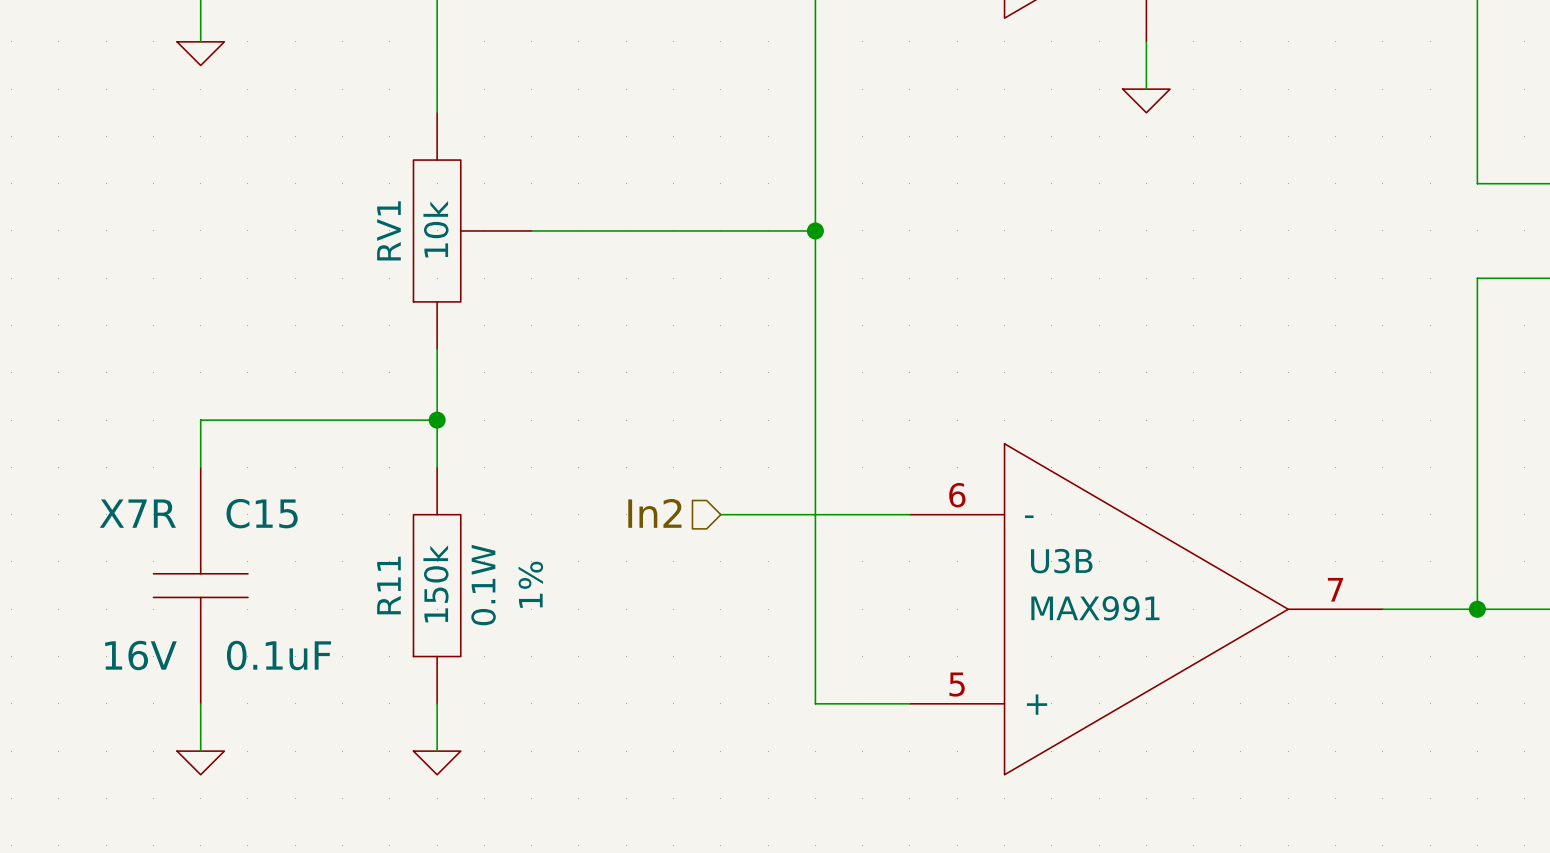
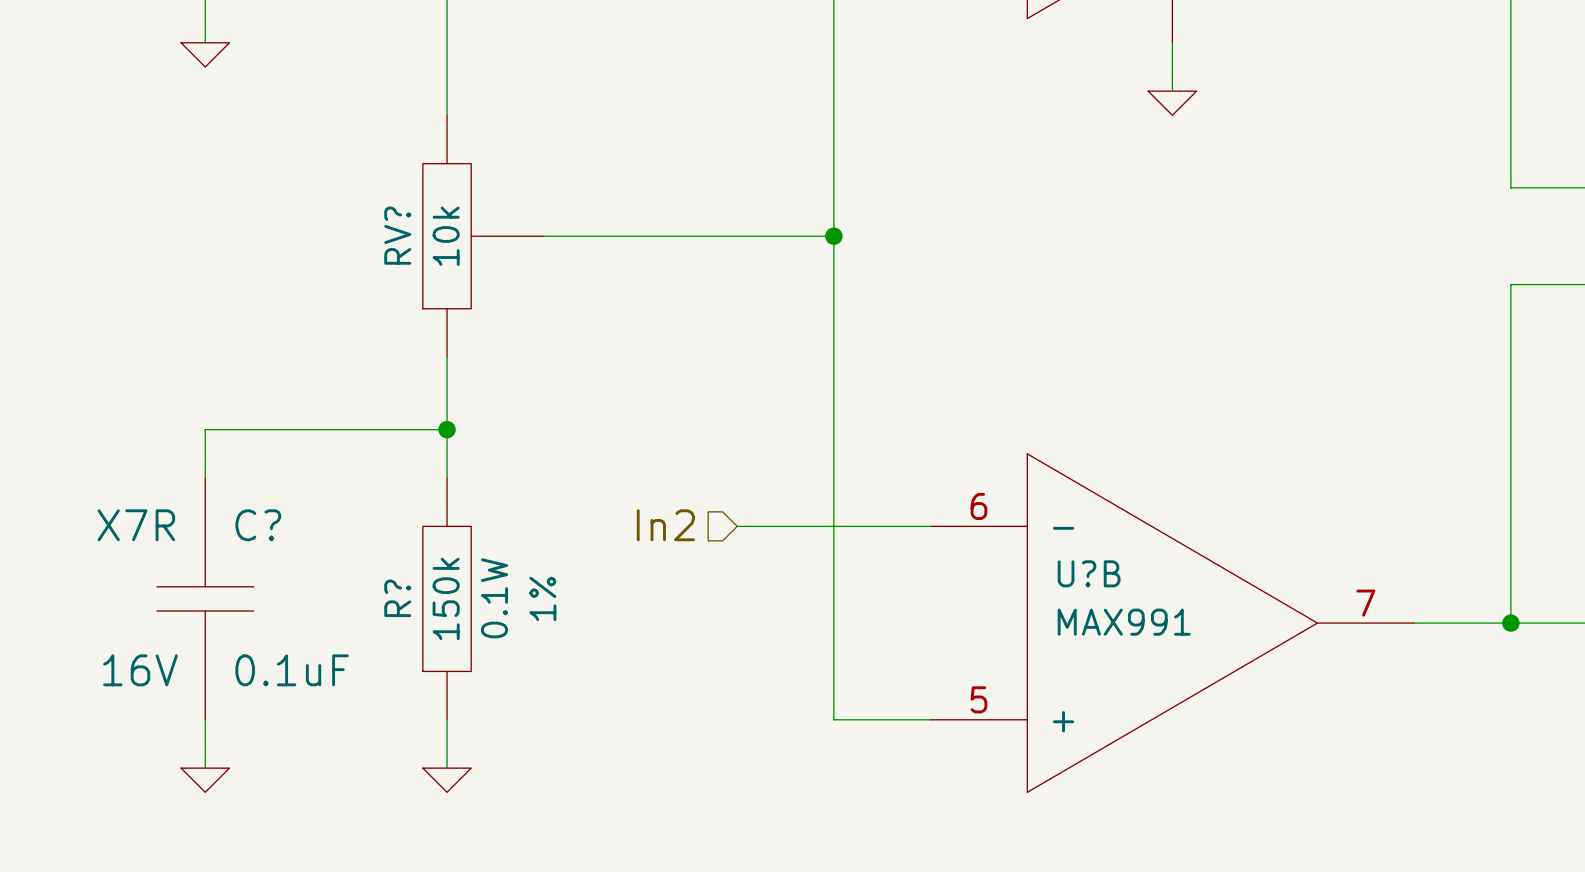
RV1 name: RV1 (388, 230) -> RV? (397, 235)
C15 name: C15 (262, 513) -> C? (258, 525)
U3B name: U3B (1061, 561) -> U?B (1089, 573)
R11 name: R11 (388, 585) -> R? (397, 598)

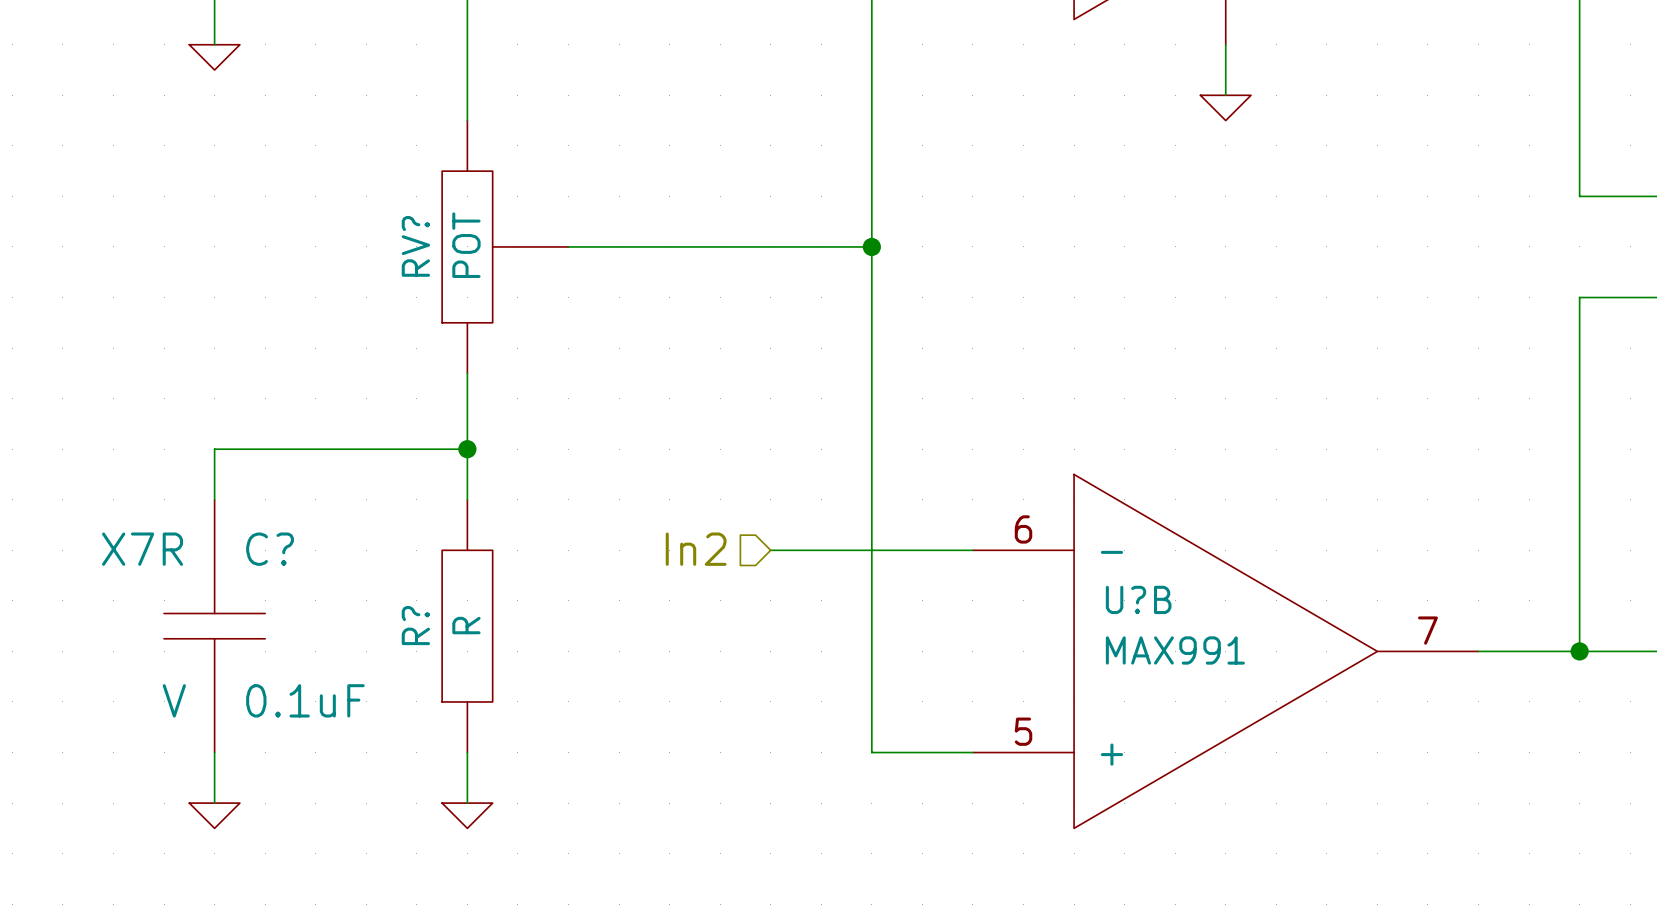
RV? value: 10k (446, 236) -> POT (466, 245)
R? value: 150k (446, 598) -> R (466, 625)
R? text: 0.1W (494, 598) -> none
R? text: 1% (542, 598) -> none
C? text: 16V (140, 670) -> V (174, 700)

